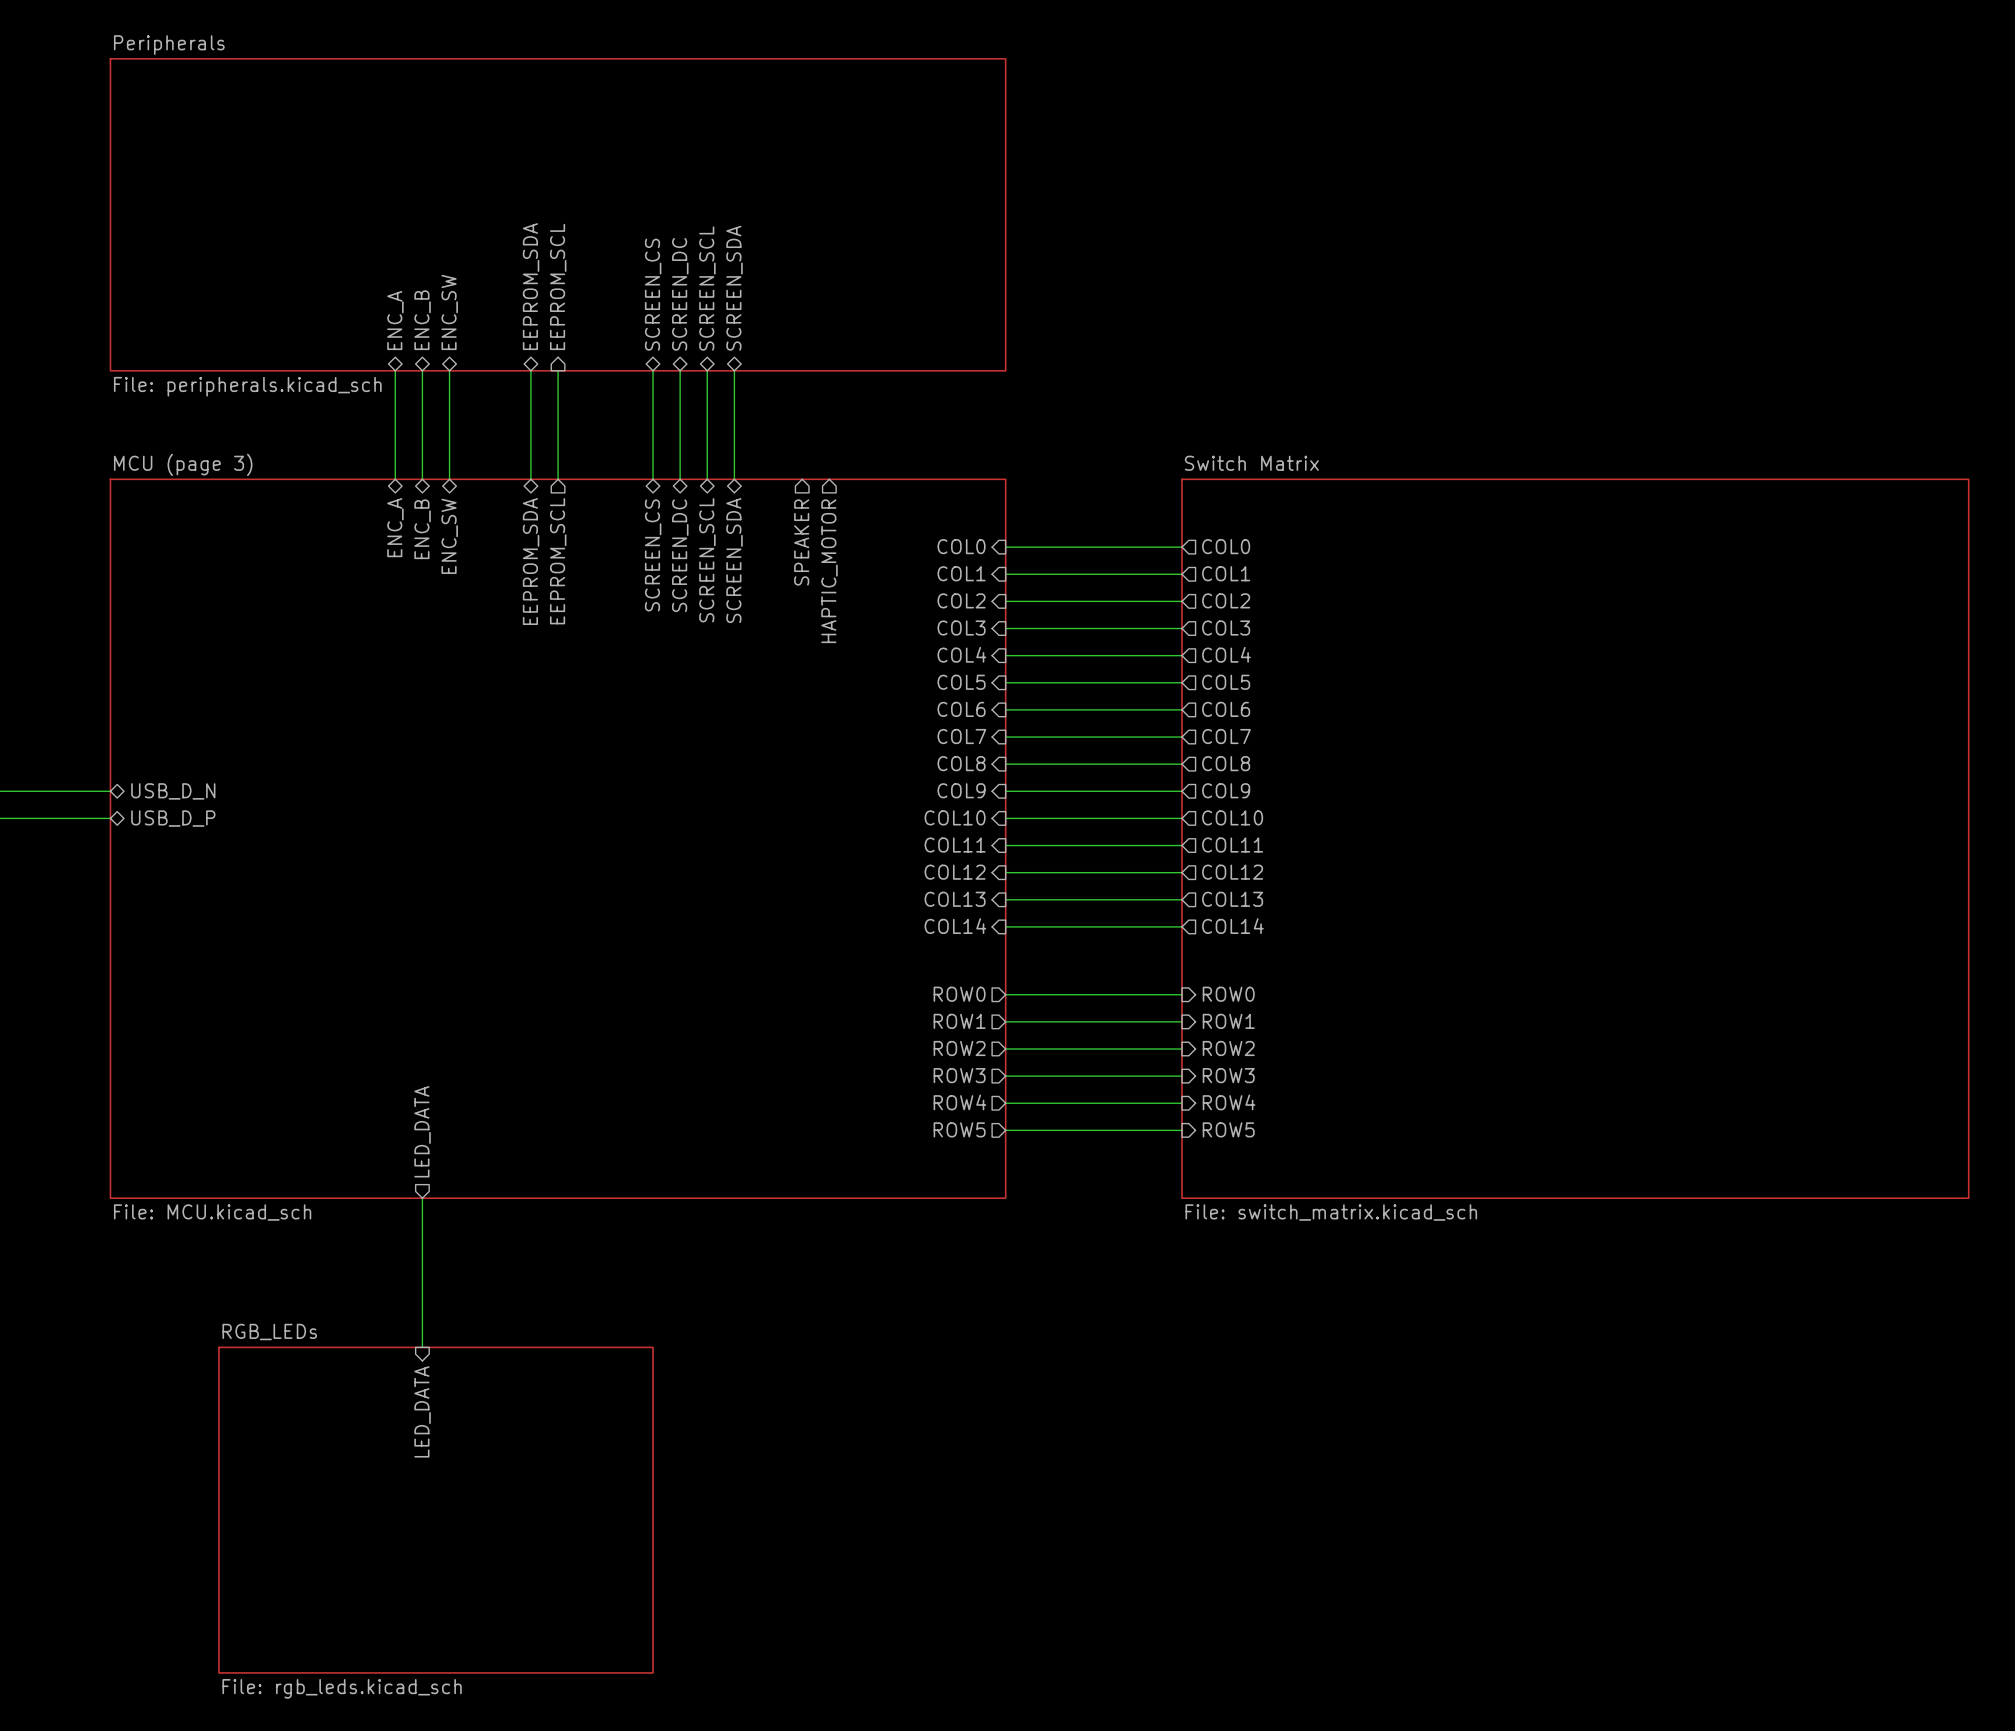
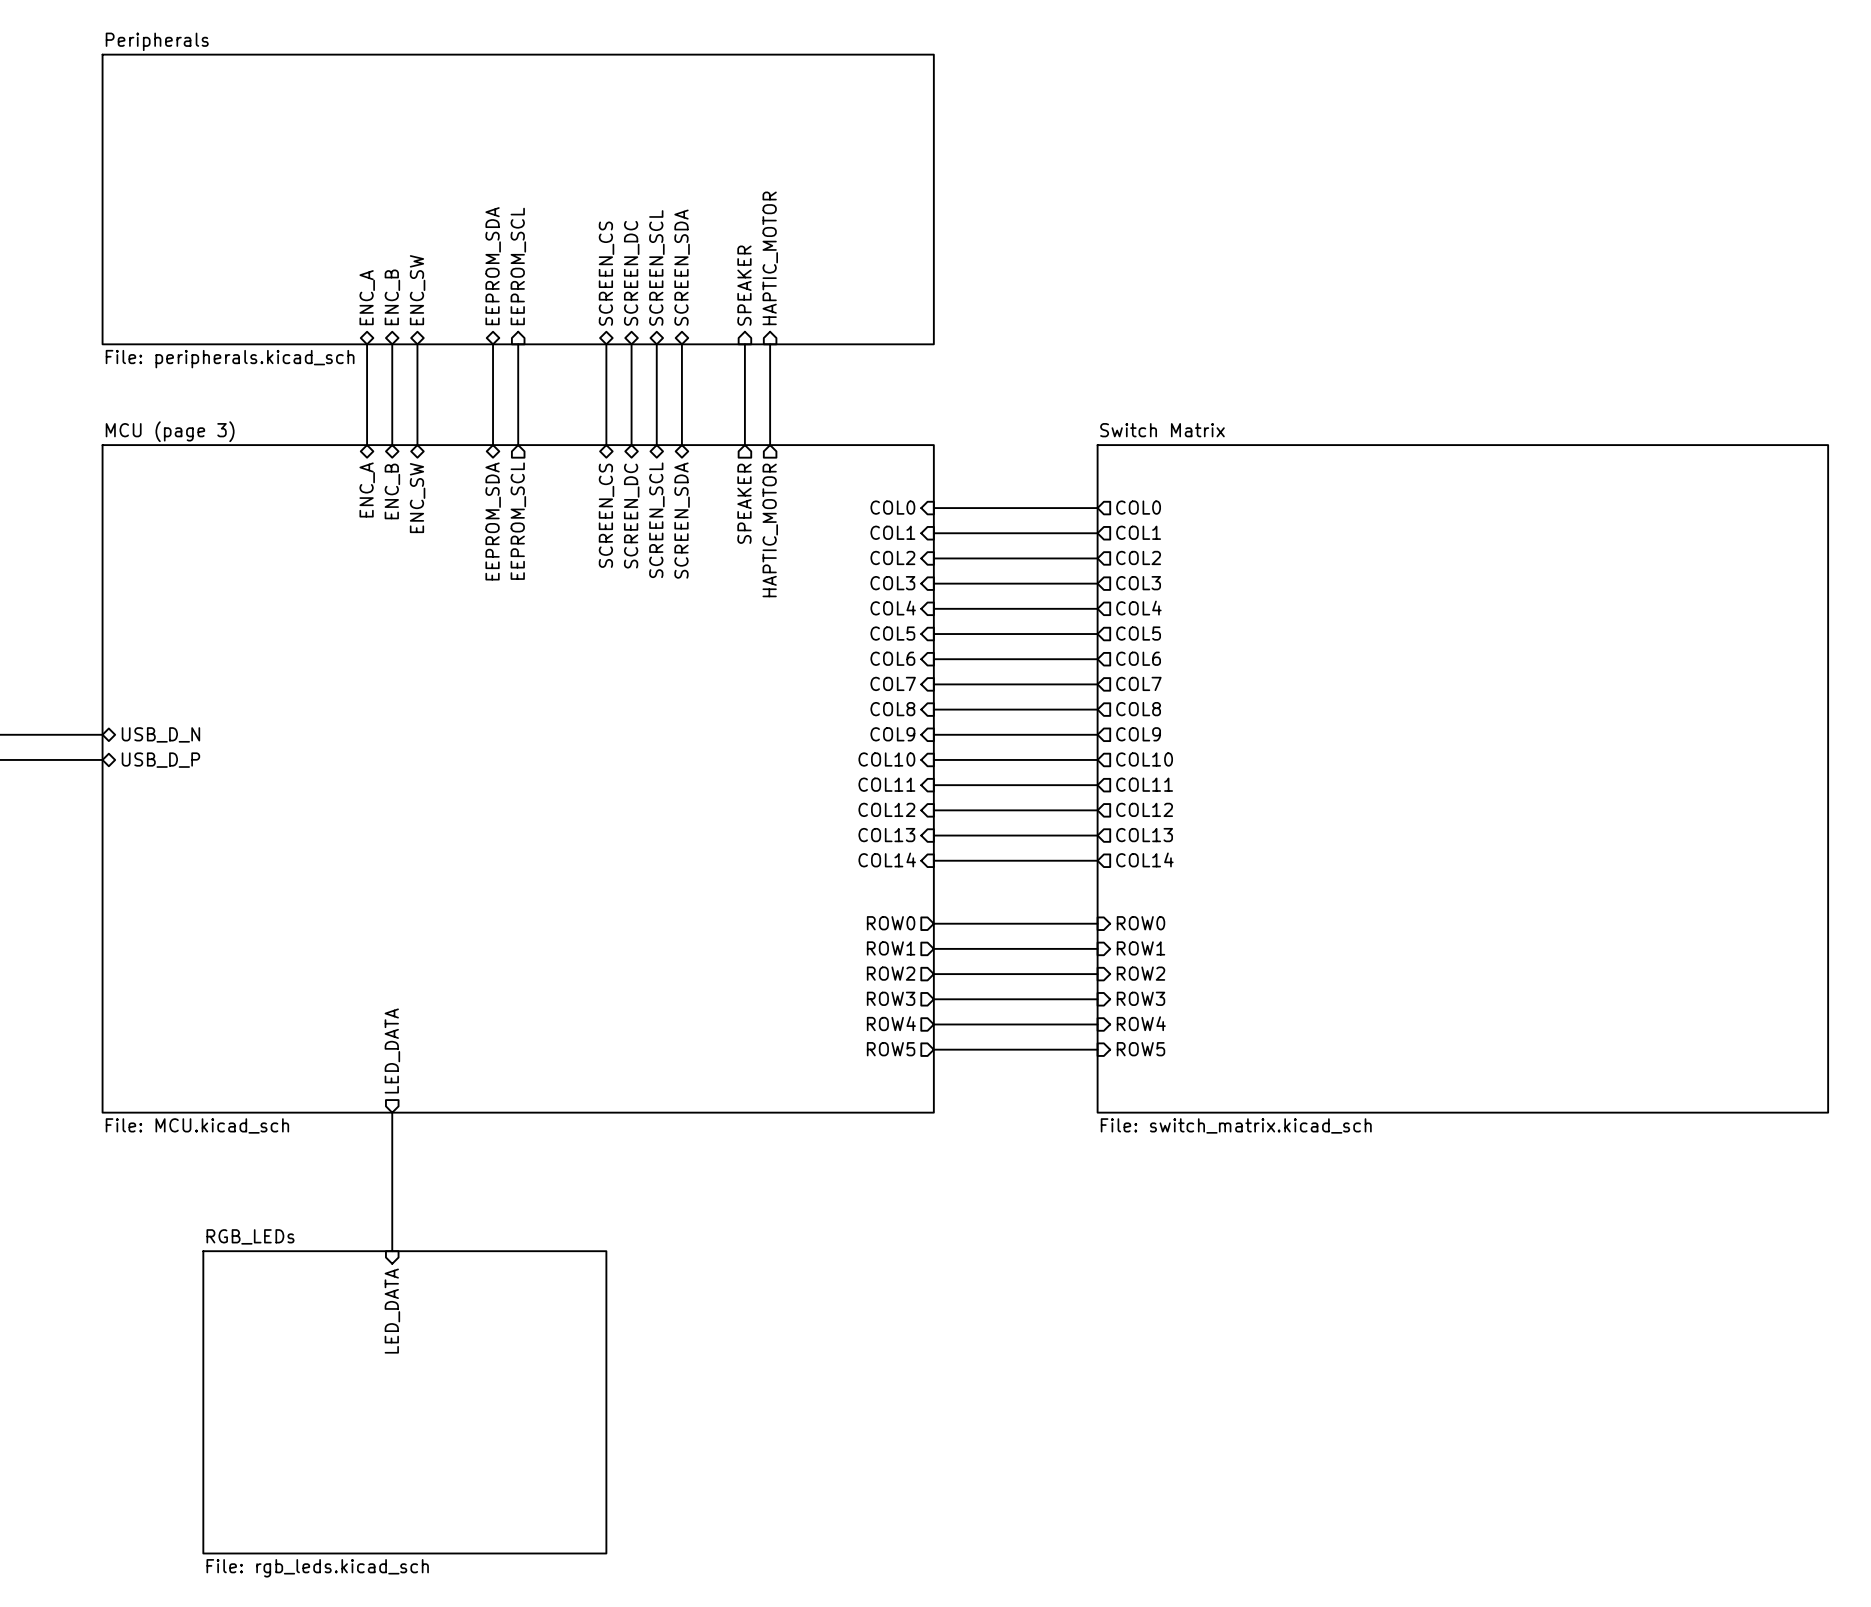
sheet pin: none -> HAPTIC_MOTOR (770, 258)
sheet pin: none -> SPEAKER (744, 285)
wire: none -> (744, 344) (744, 445)
wire: none -> (770, 344) (770, 445)

